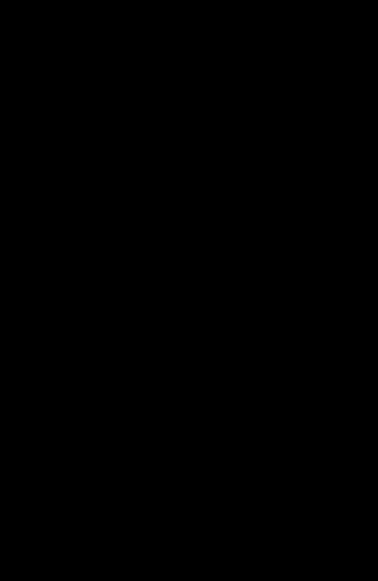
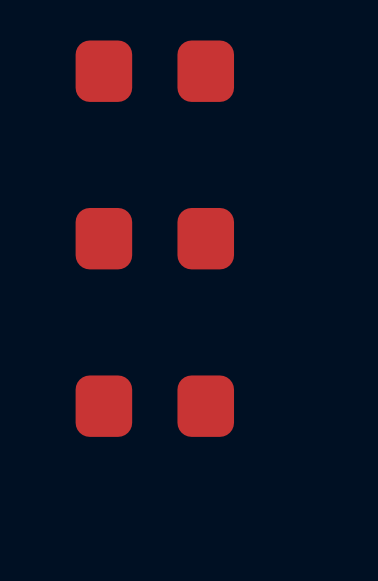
part: none -> (154, 71)
part: none -> (154, 238)
part: none -> (154, 406)

